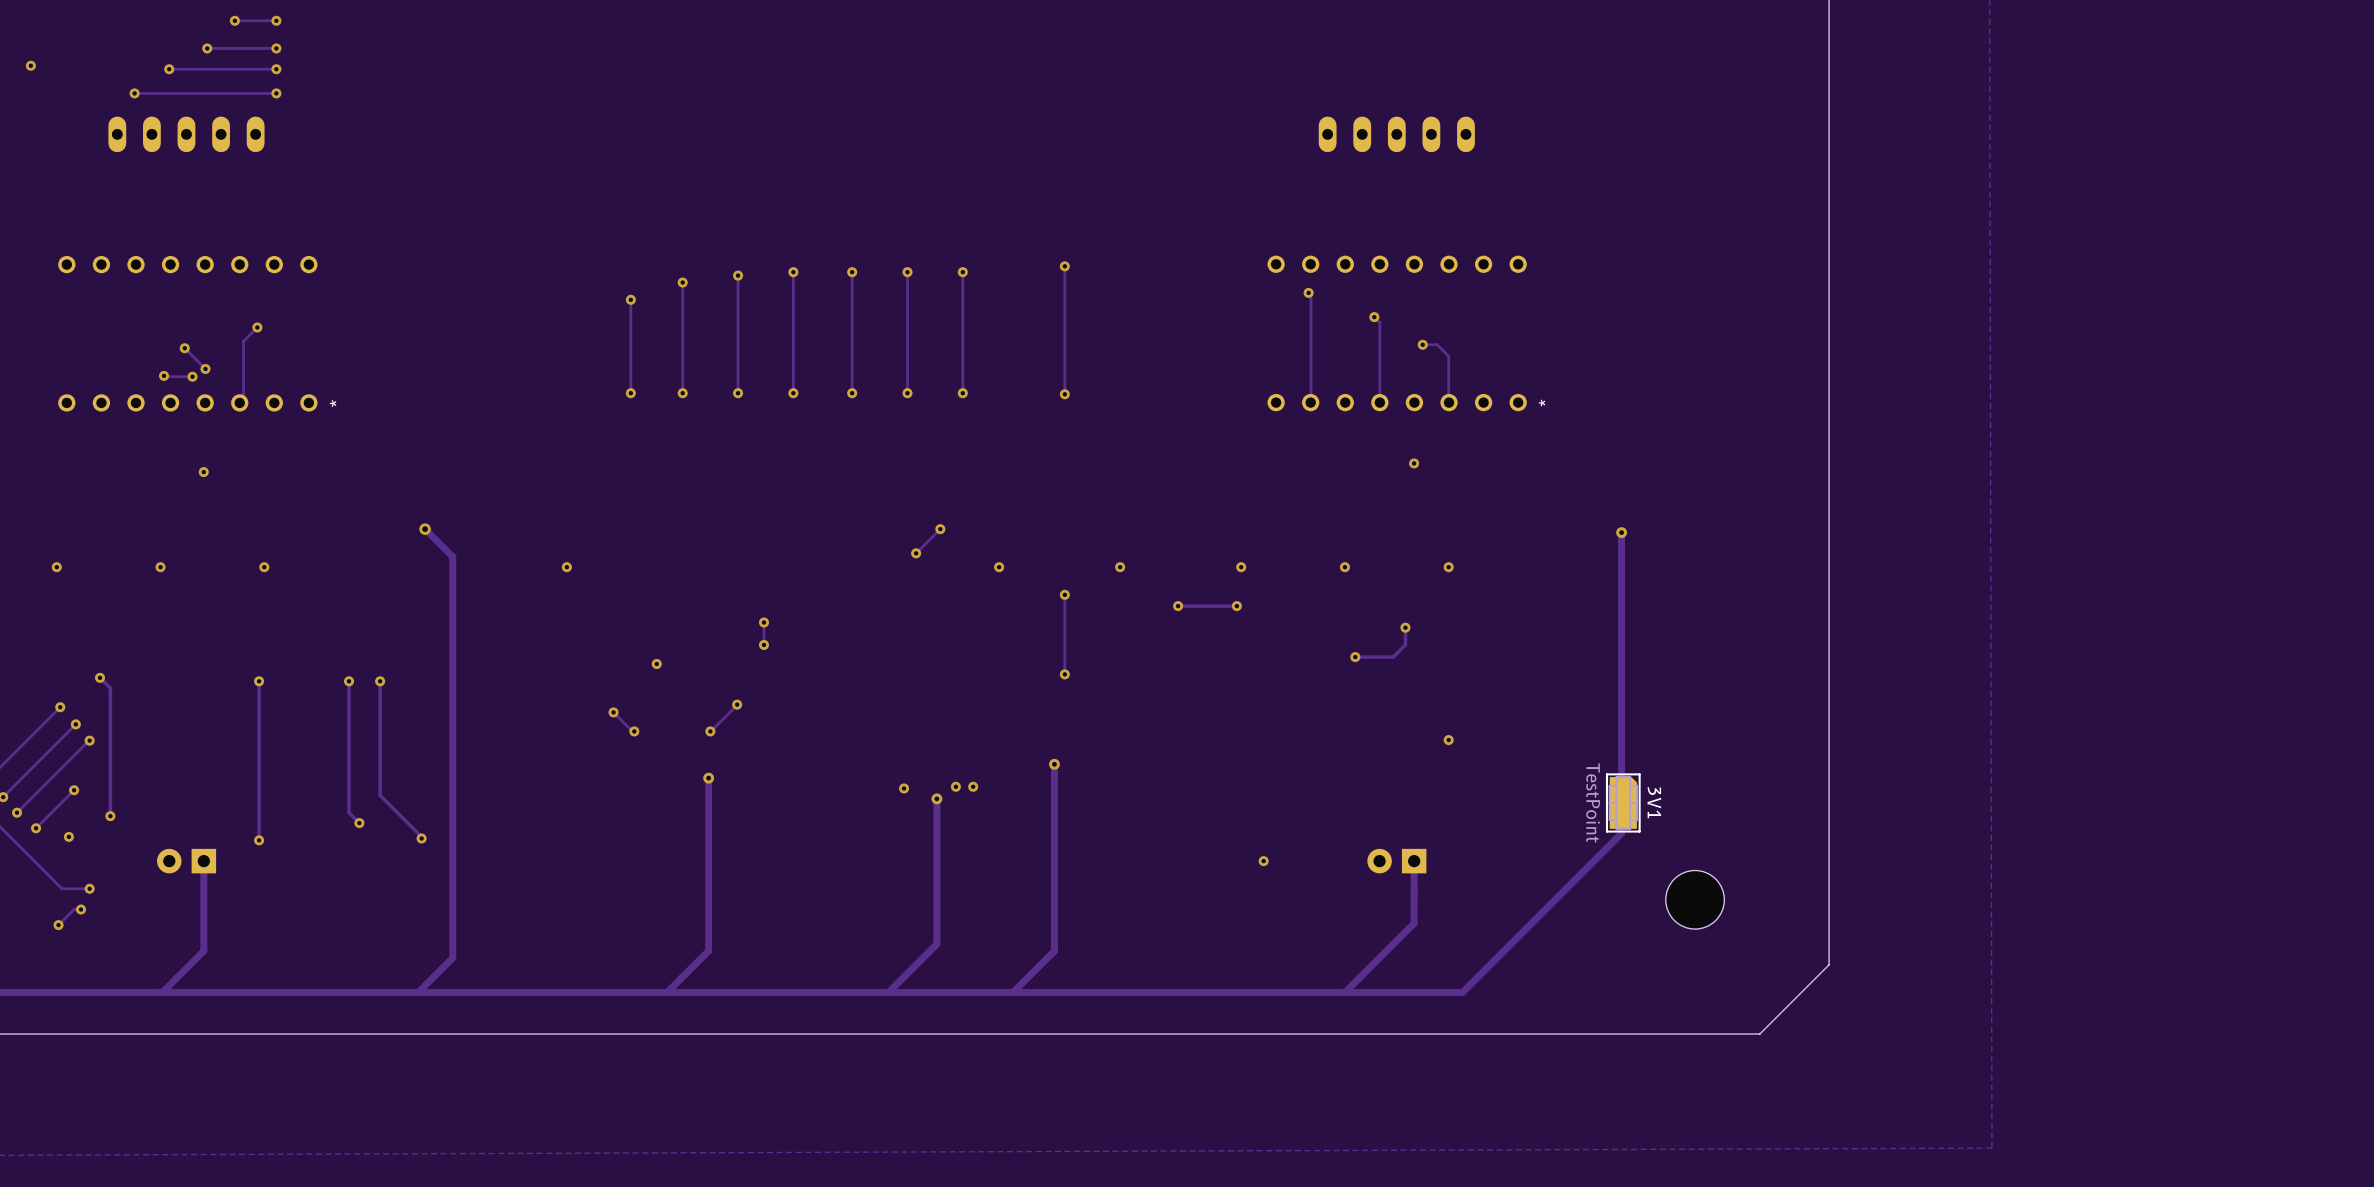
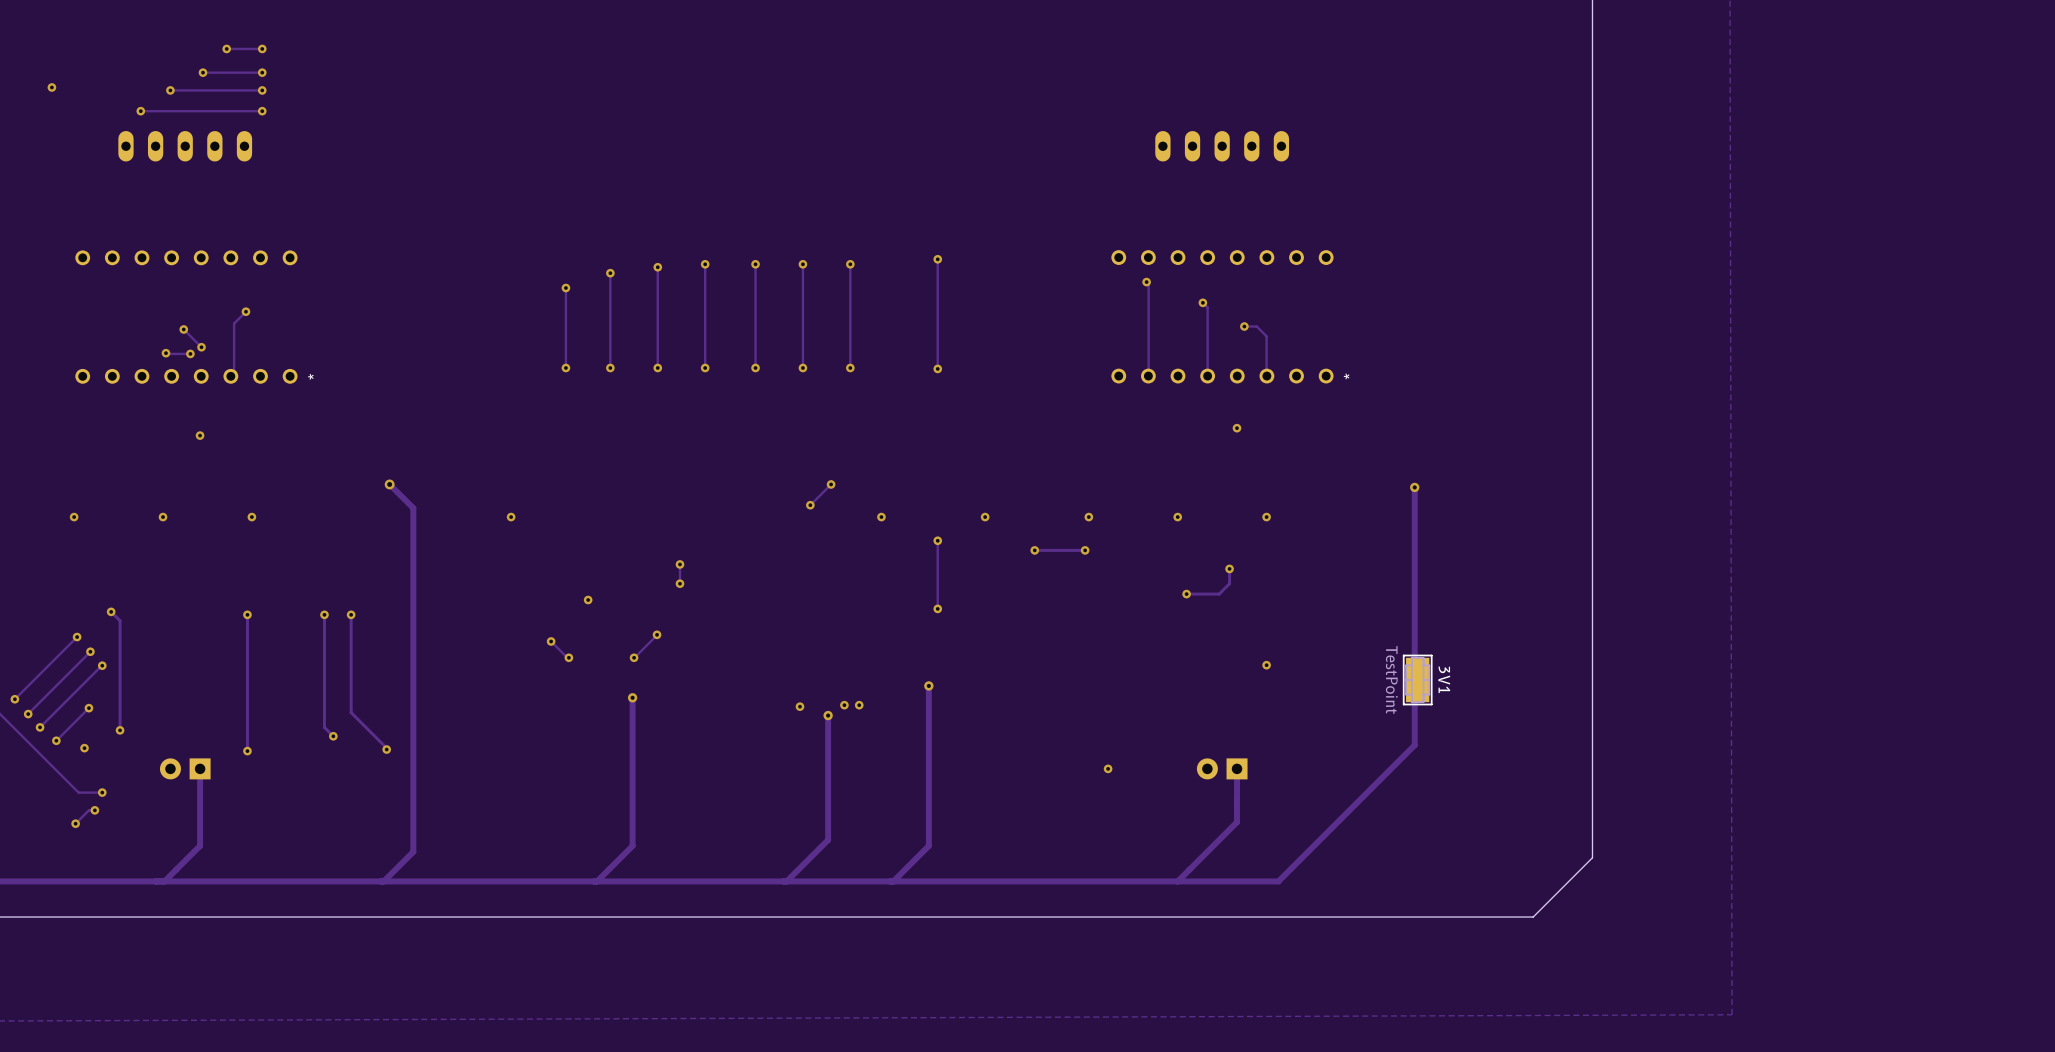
3V1 footprint: [1605, 773, 1641, 833] -> [1402, 654, 1433, 706]
part: (1695, 899) -> none

